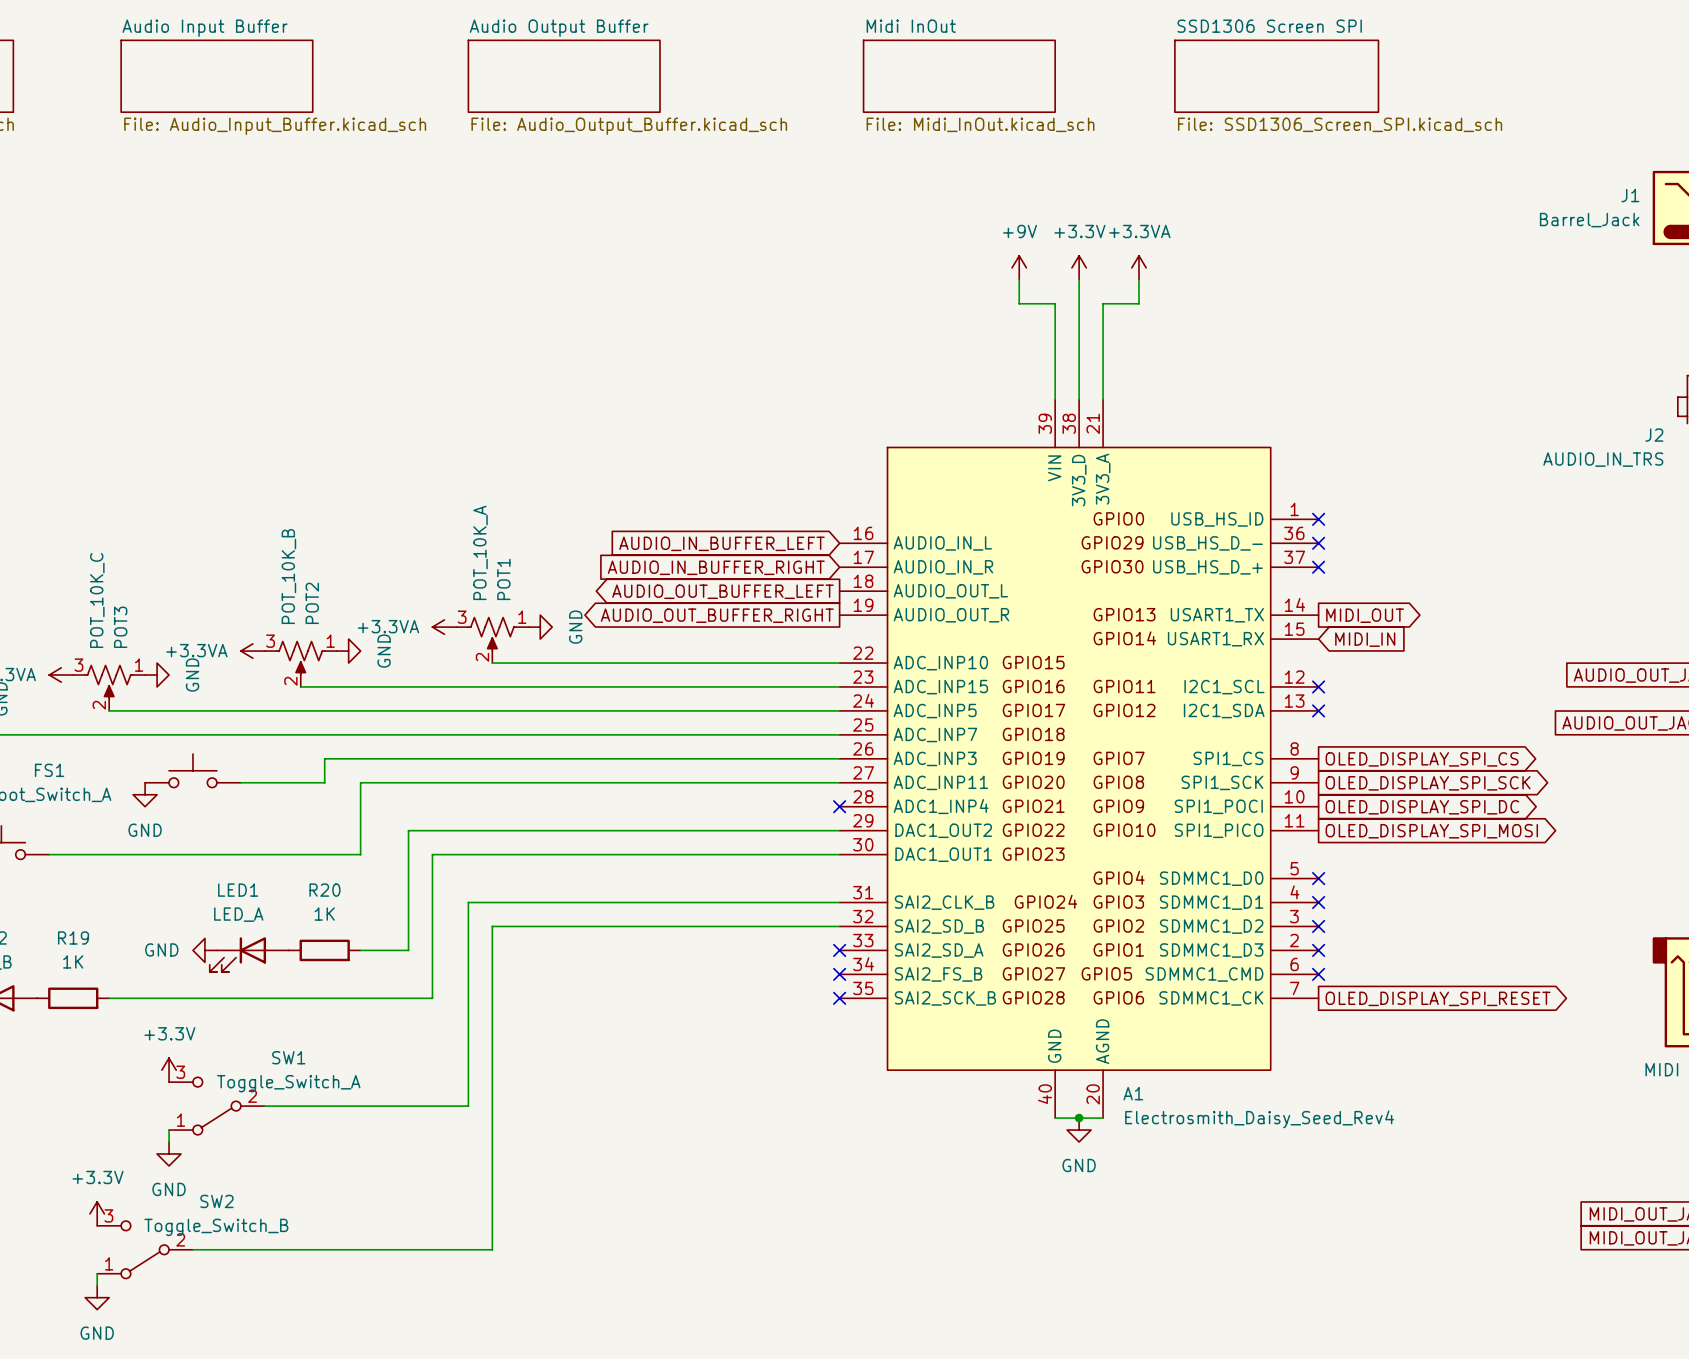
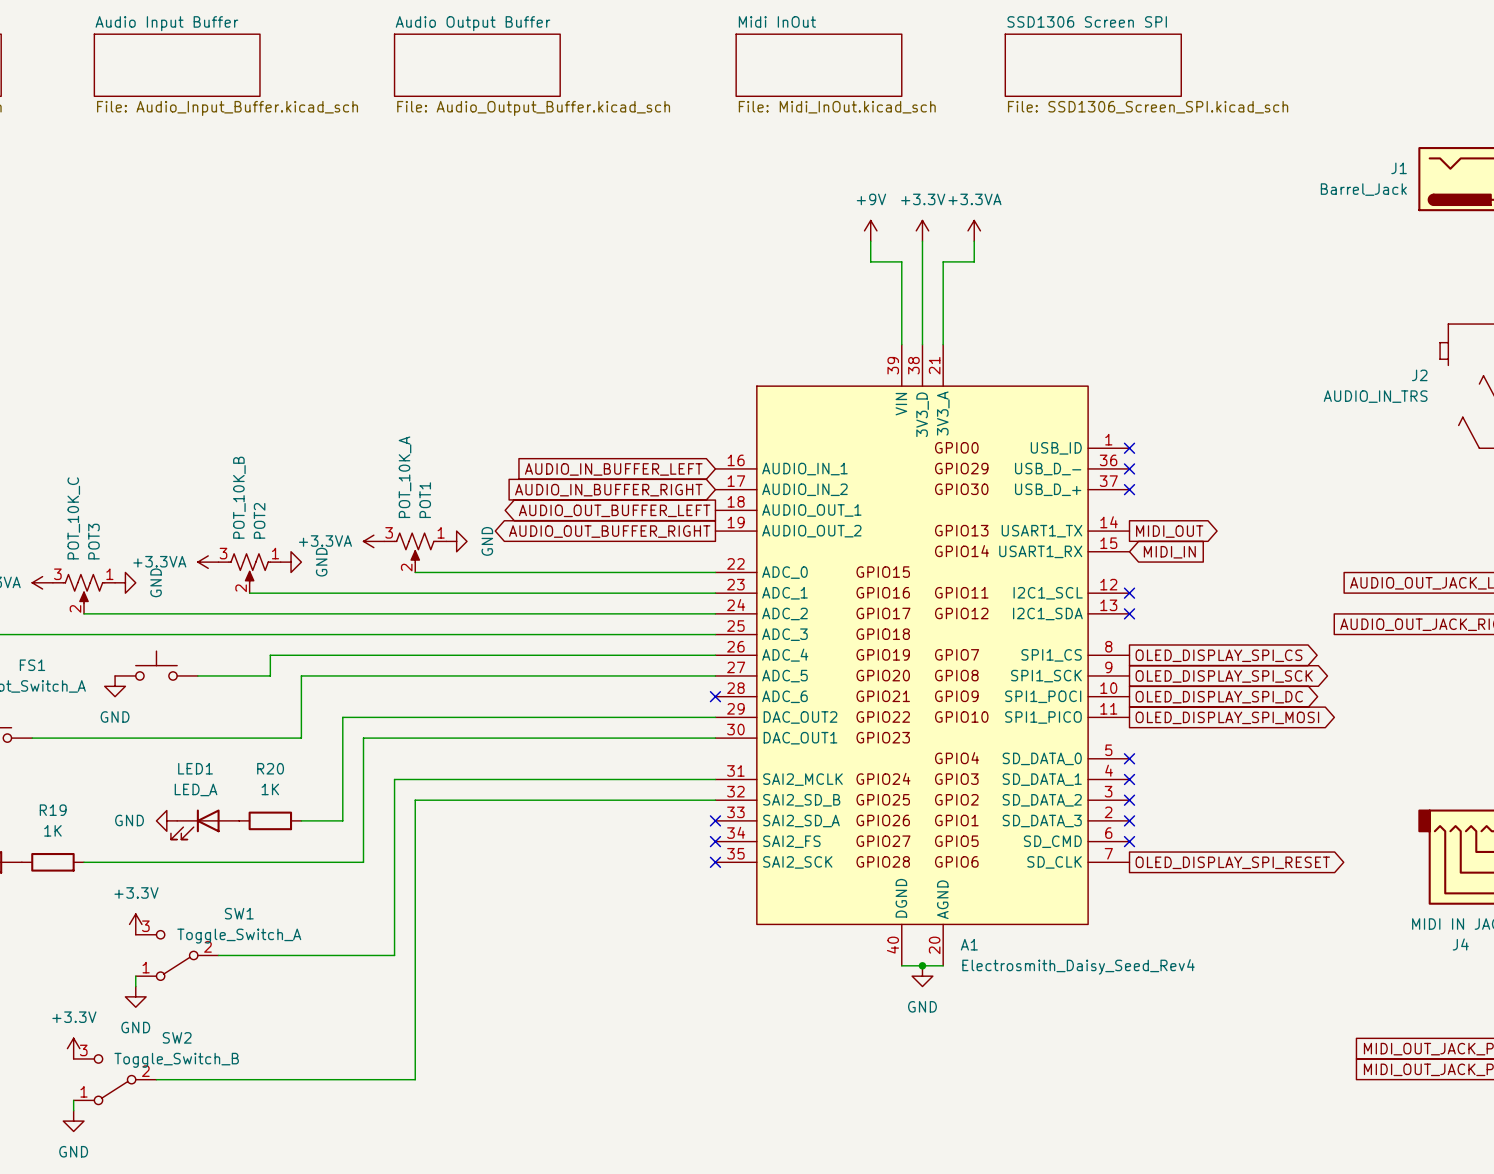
A1 symbol: [839, 399, 1319, 1119] -> [715, 344, 1130, 966]

